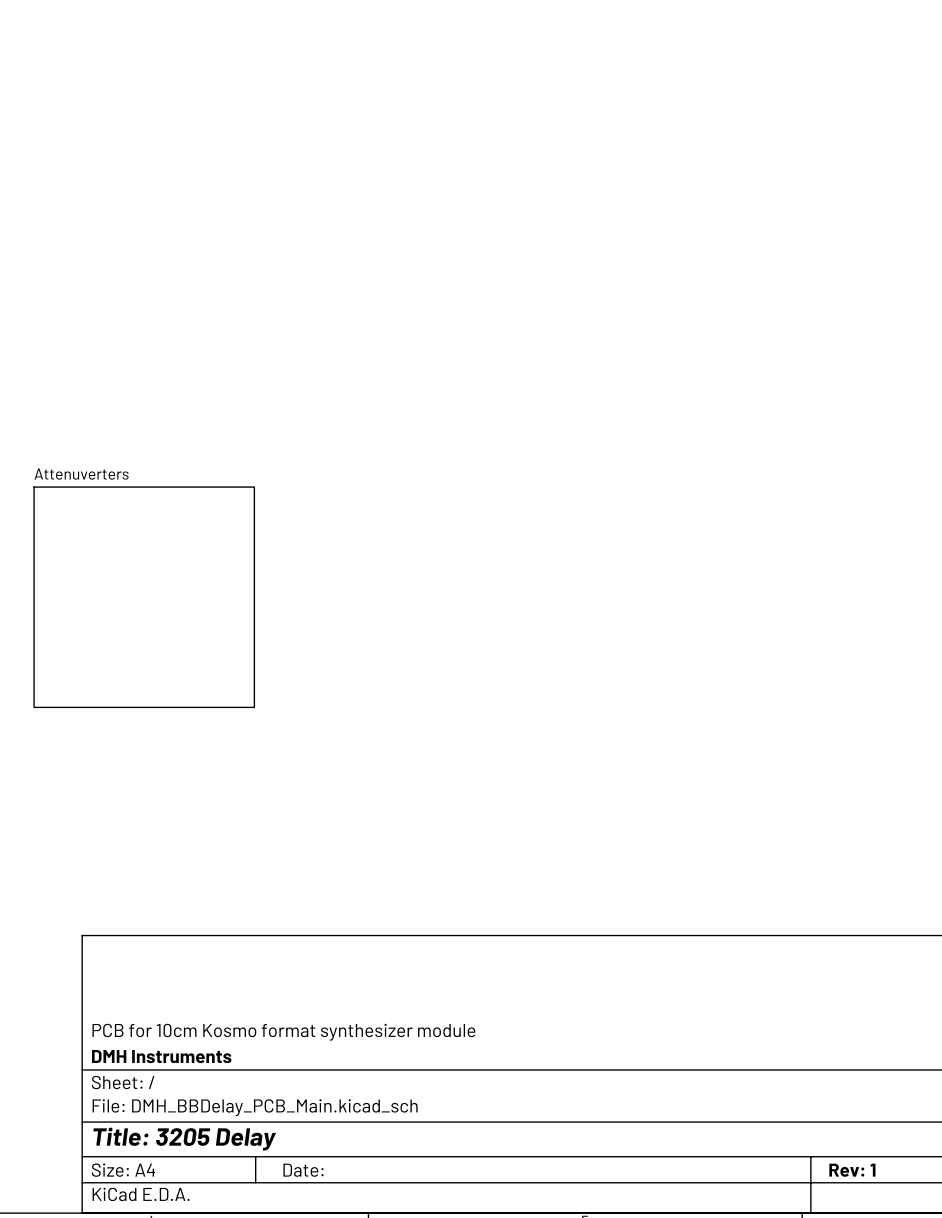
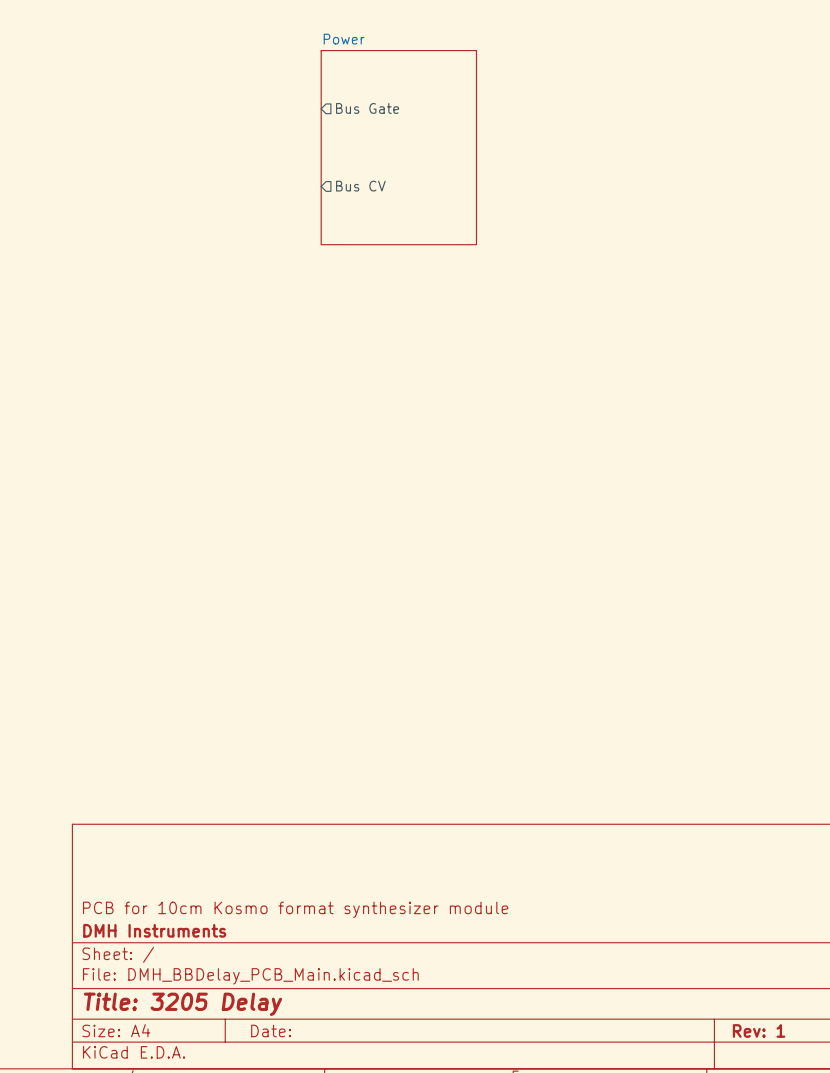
sheet pin: none -> Bus Gate (367, 108)
sheet Power: none -> (398, 147)
sheet pin: none -> Bus CV (360, 186)
sheet Attenuverters: (144, 597) -> none

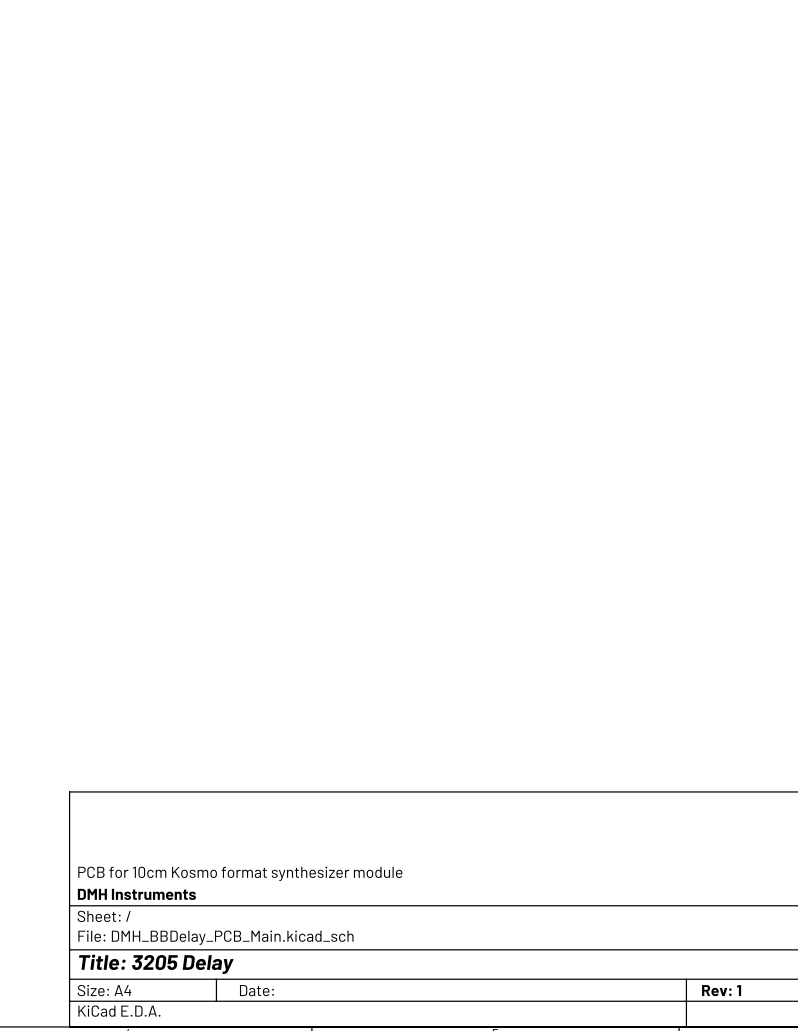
sheet pin: Bus Gate (367, 108) -> none
sheet Power: (398, 147) -> none
sheet pin: Bus CV (360, 186) -> none

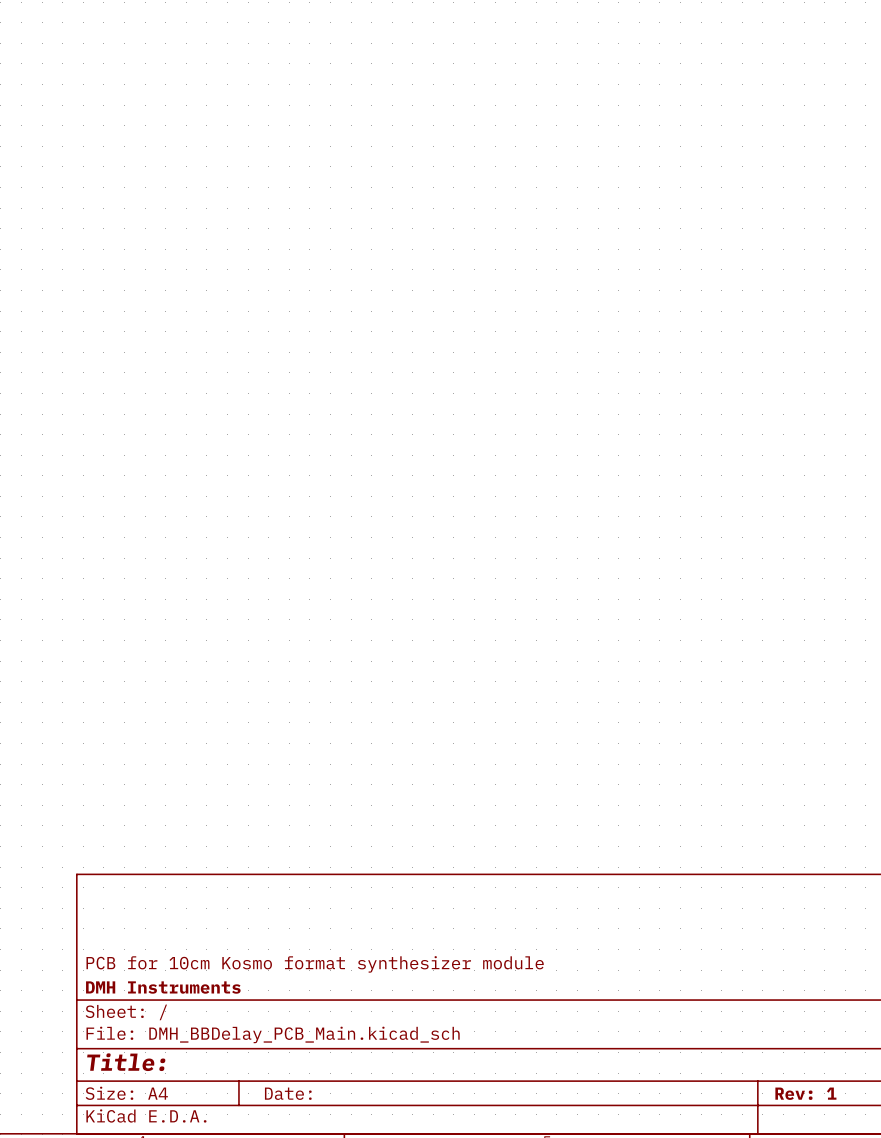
title block: Title: 3205 Delay (156, 964) -> Title: (126, 1062)

